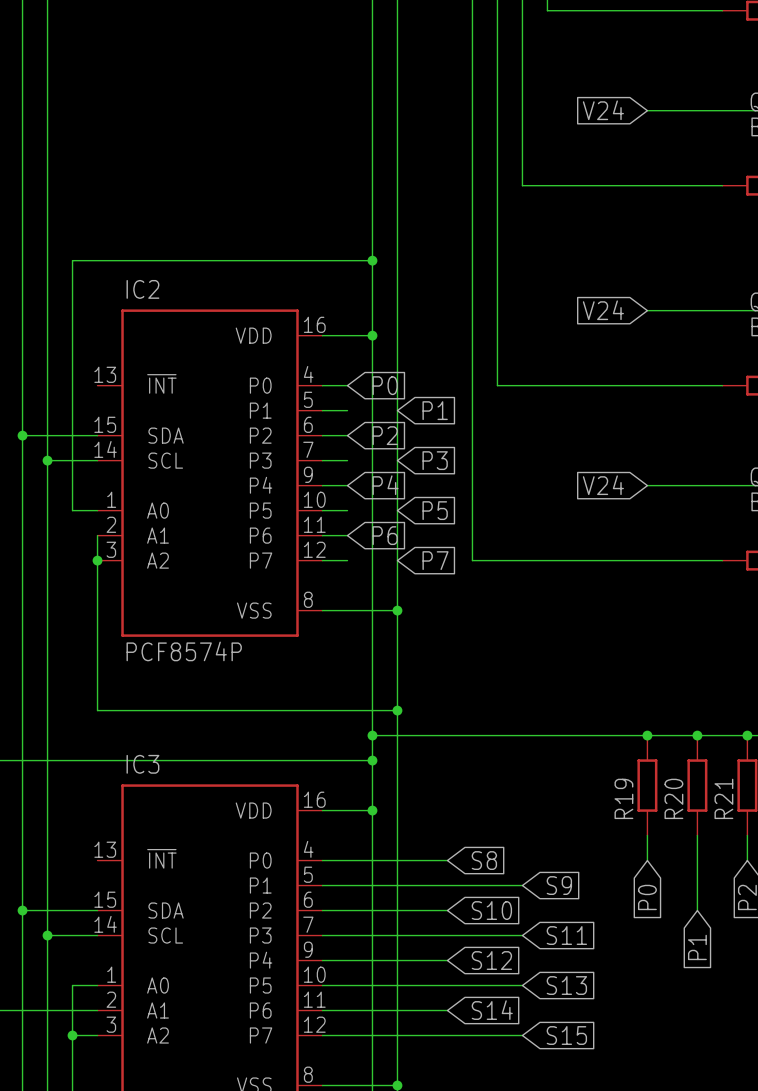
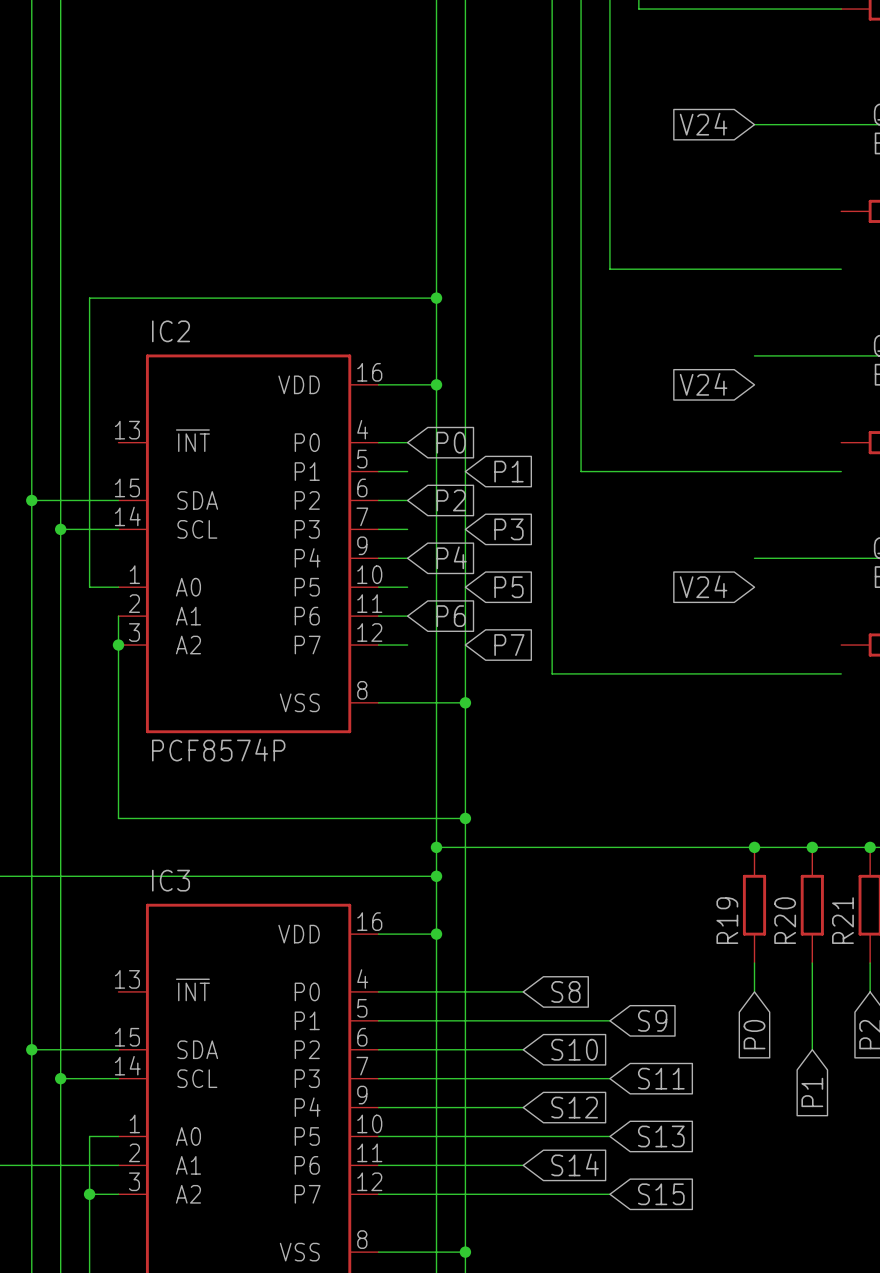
wire: (522, 185) (722, 185) -> (609, 211) (609, 269) (841, 269)
global label position: V24 (603, 310) -> V24 (703, 384)
wire: (497, 385) (722, 385) -> (581, 442) (581, 471) (841, 471)
global label position: V24 (603, 485) -> V24 (703, 586)
wire: (472, 560) (722, 560) -> (552, 645) (552, 673) (841, 673)

